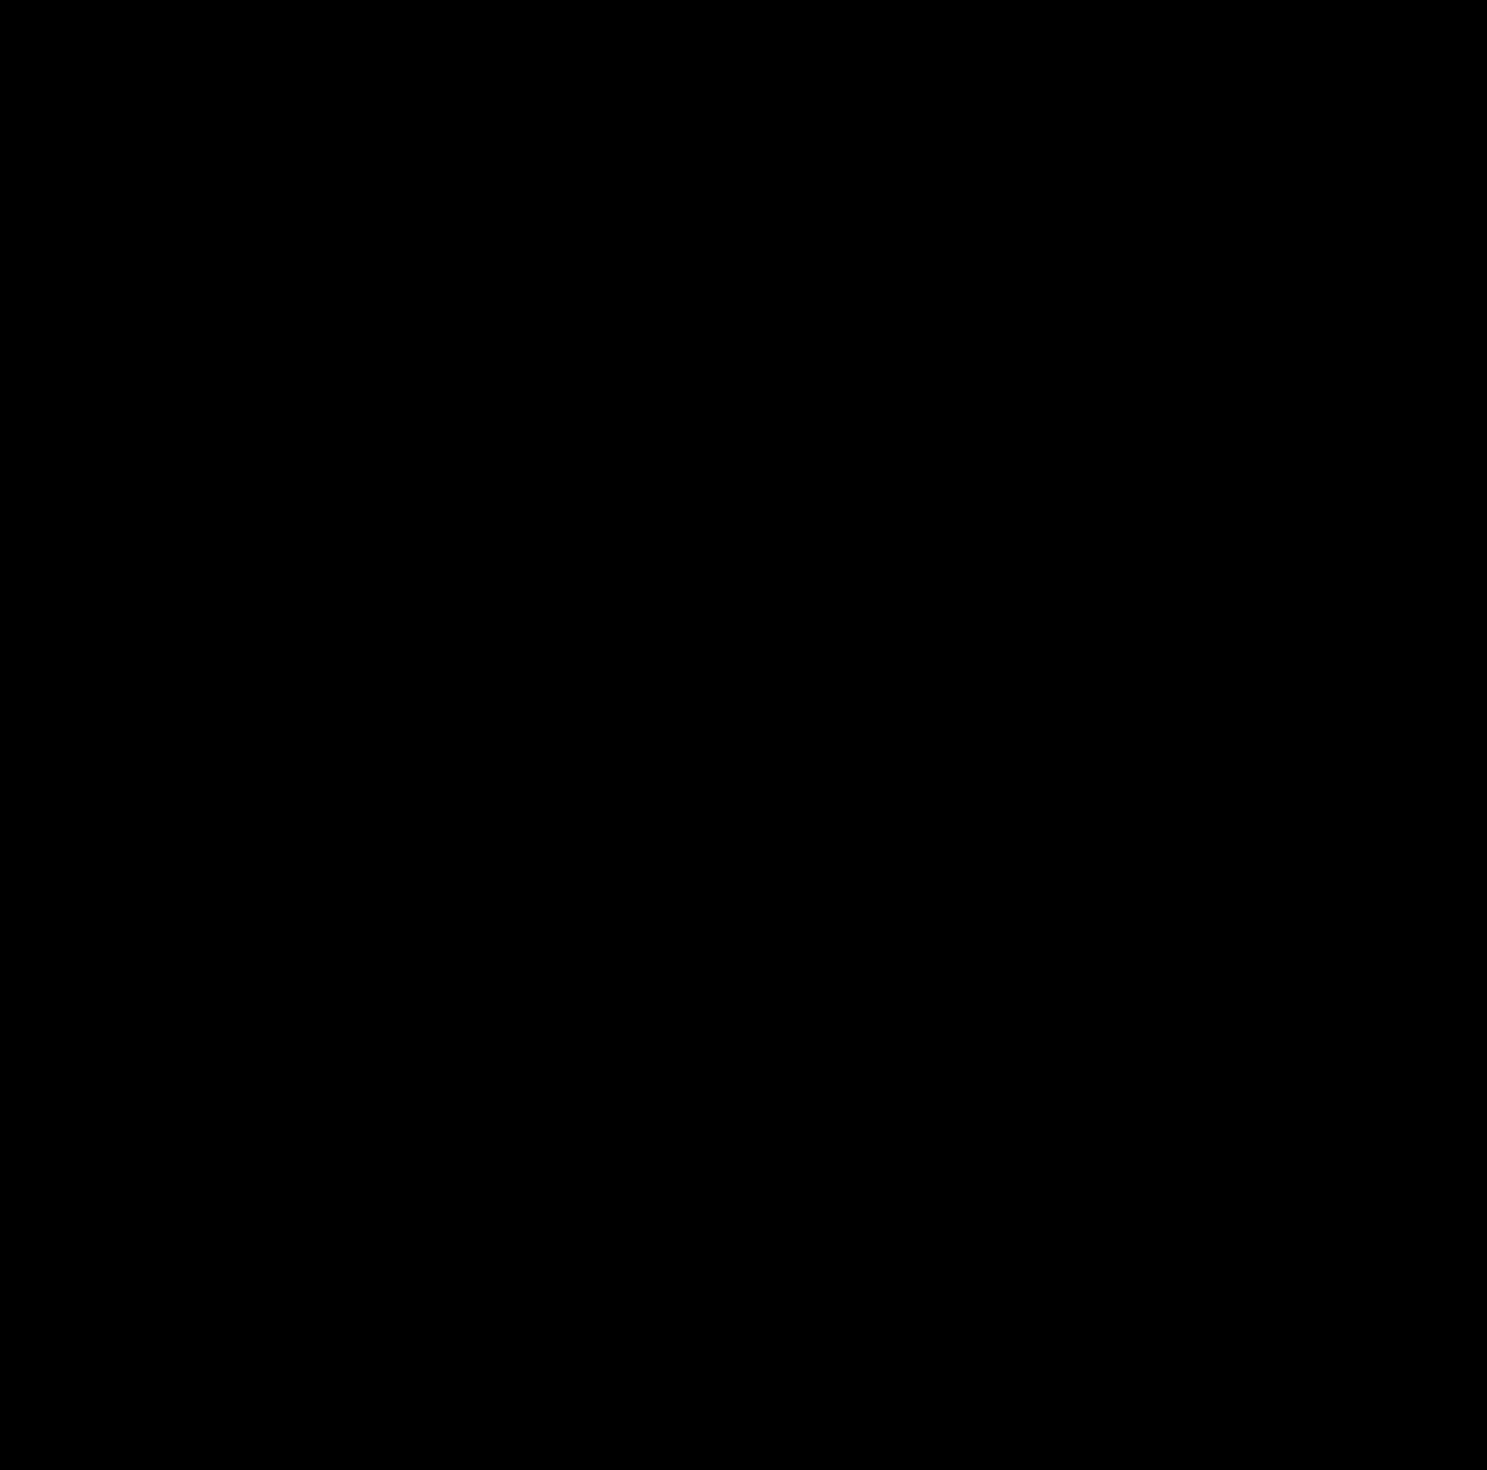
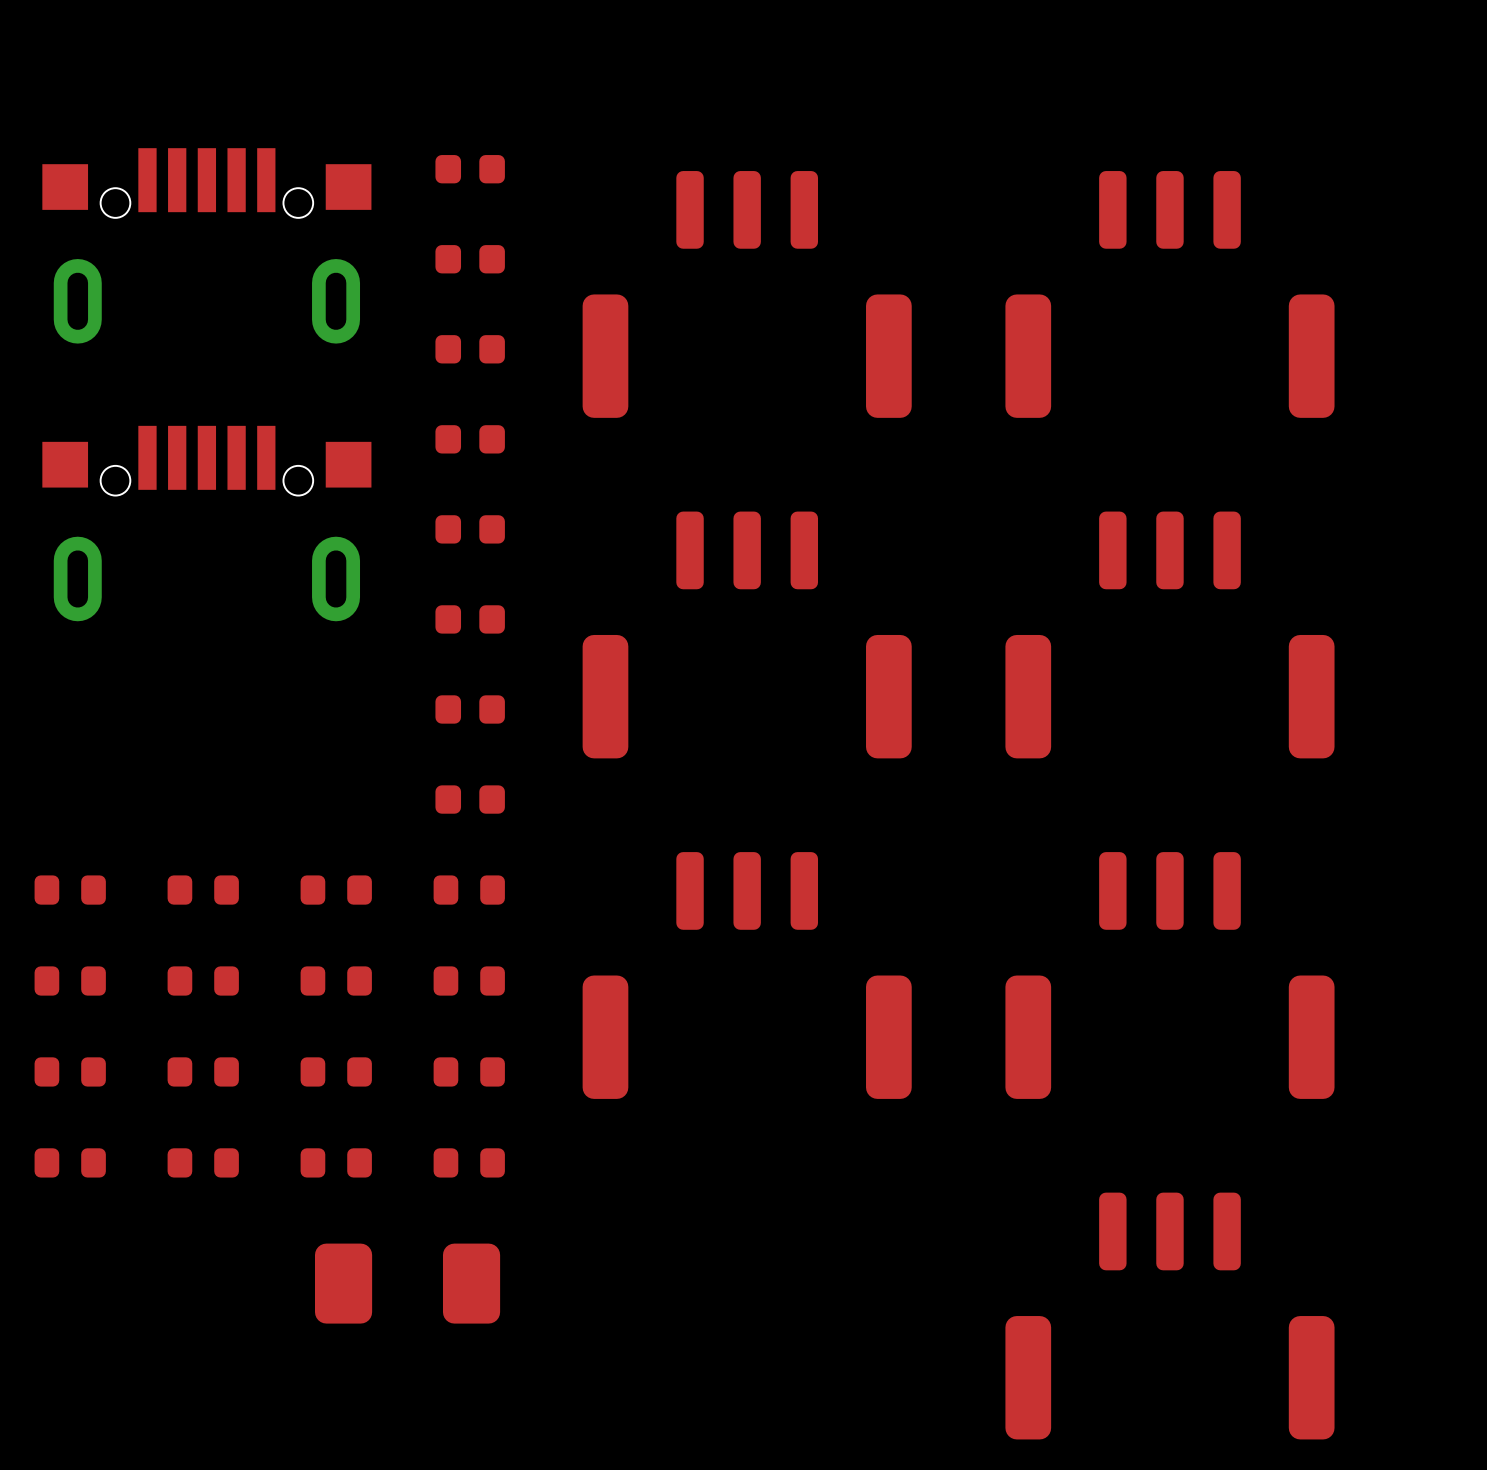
part: none -> (470, 169)
part: none -> (206, 245)
part: none -> (470, 259)
part: none -> (747, 294)
part: none -> (1169, 294)
part: none -> (470, 349)
part: none -> (470, 439)
part: none -> (206, 523)
part: none -> (470, 529)
part: none -> (470, 619)
part: none -> (747, 634)
part: none -> (1169, 634)
part: none -> (470, 709)
part: none -> (470, 799)
part: none -> (70, 890)
part: none -> (203, 890)
part: none -> (336, 890)
part: none -> (469, 890)
part: none -> (747, 975)
part: none -> (1169, 975)
part: none -> (70, 980)
part: none -> (203, 980)
part: none -> (336, 980)
part: none -> (469, 980)
part: none -> (70, 1071)
part: none -> (203, 1071)
part: none -> (336, 1071)
part: none -> (469, 1071)
part: none -> (70, 1162)
part: none -> (203, 1162)
part: none -> (336, 1162)
part: none -> (469, 1162)
part: none -> (407, 1283)
part: none -> (1169, 1316)

